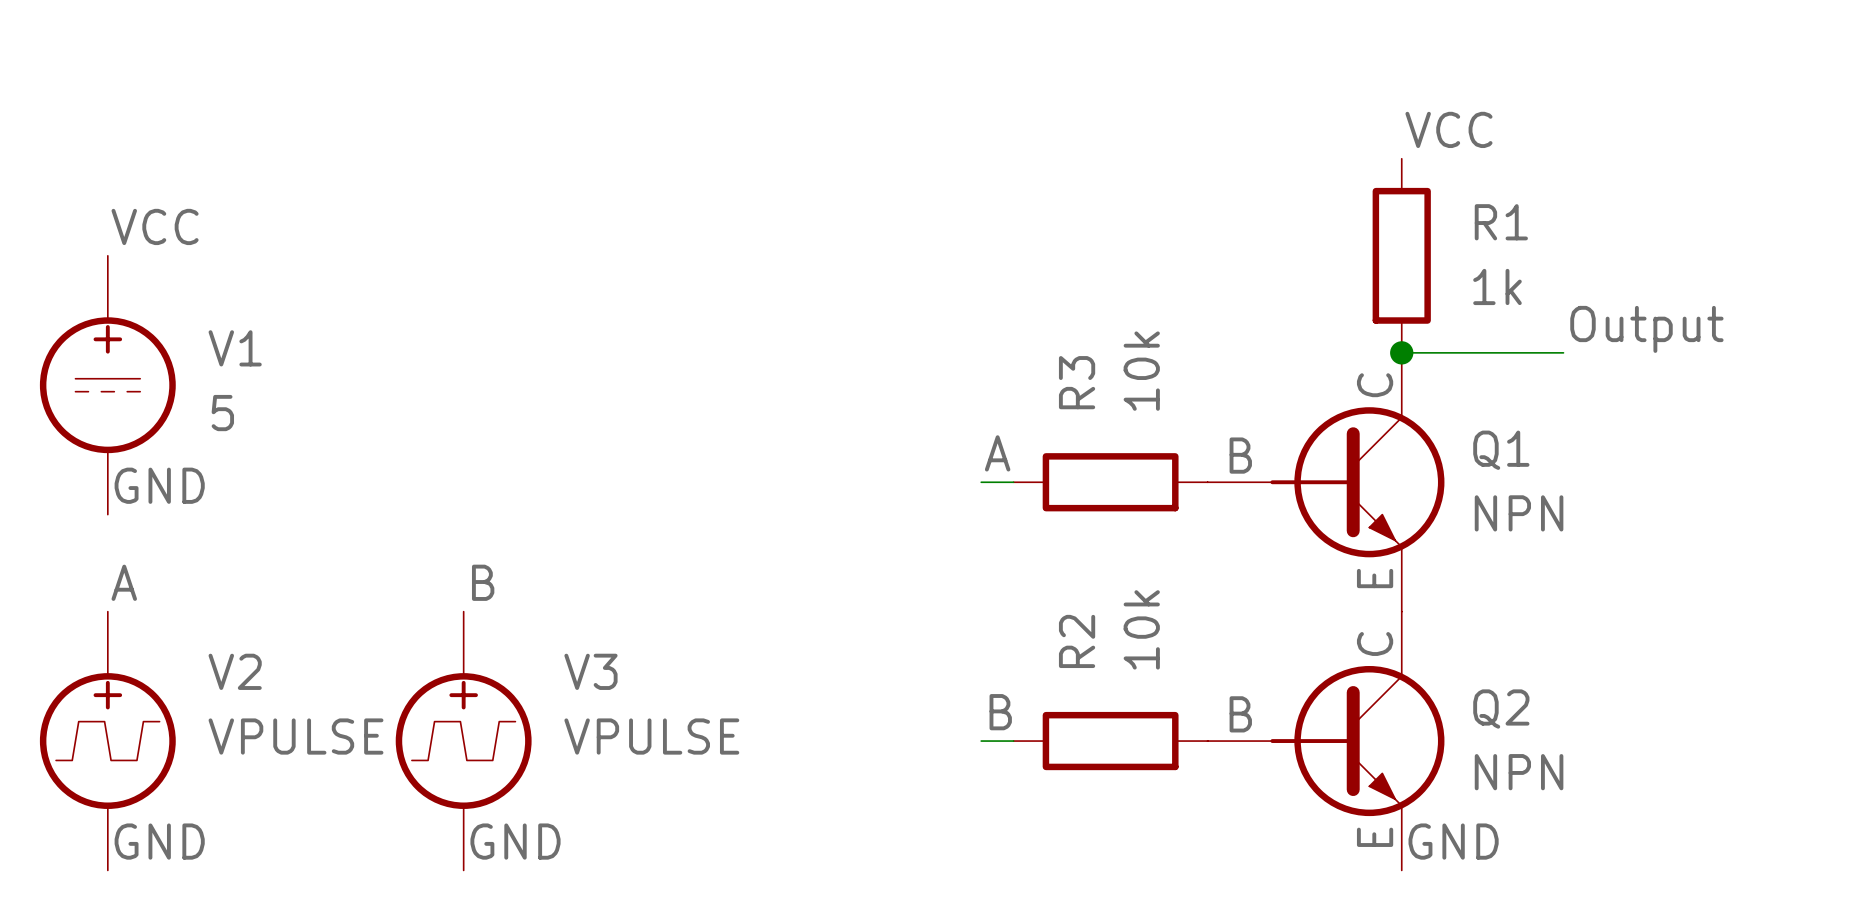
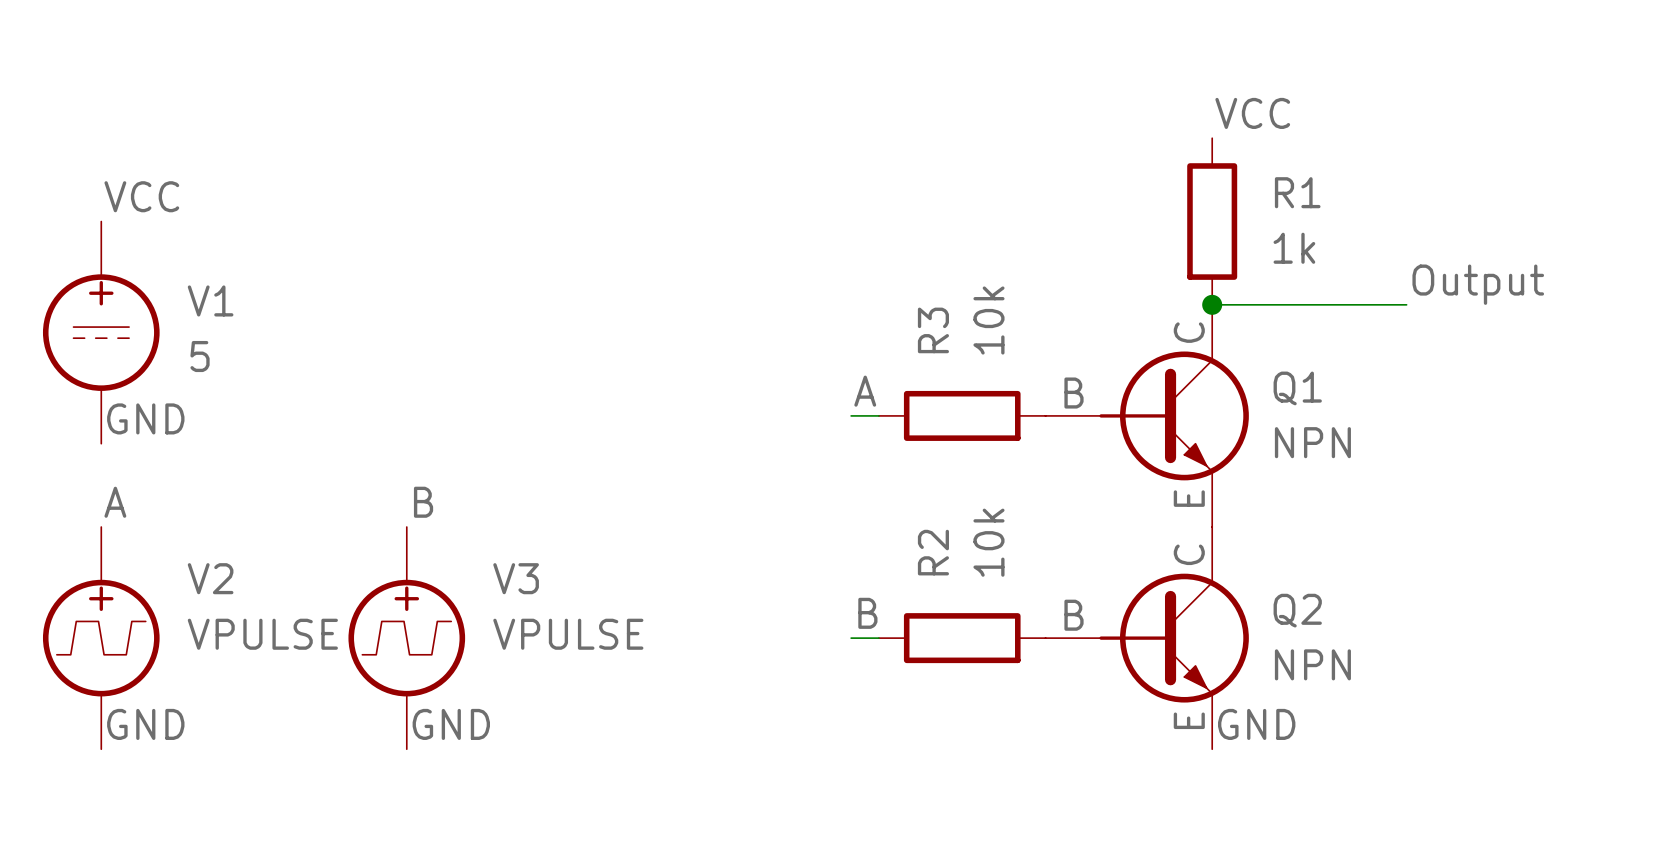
label position: Output (1646, 329) -> Output (1478, 284)
wire: none -> (1351, 304) (1406, 304)

